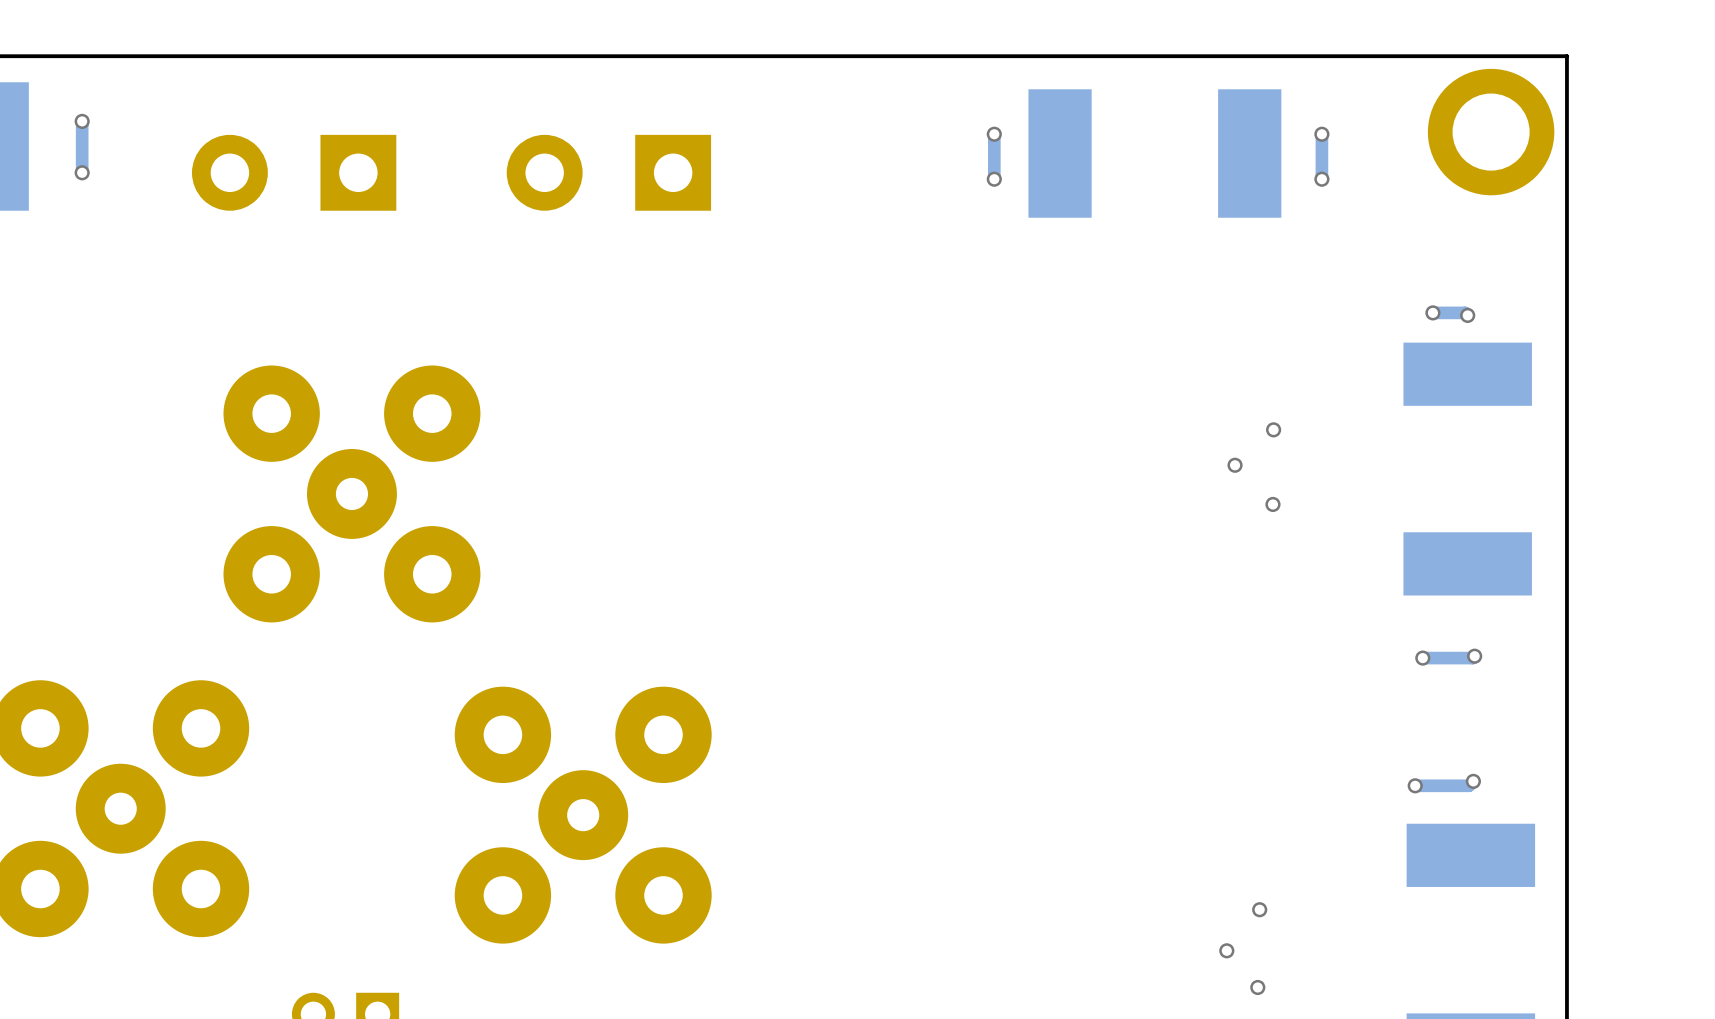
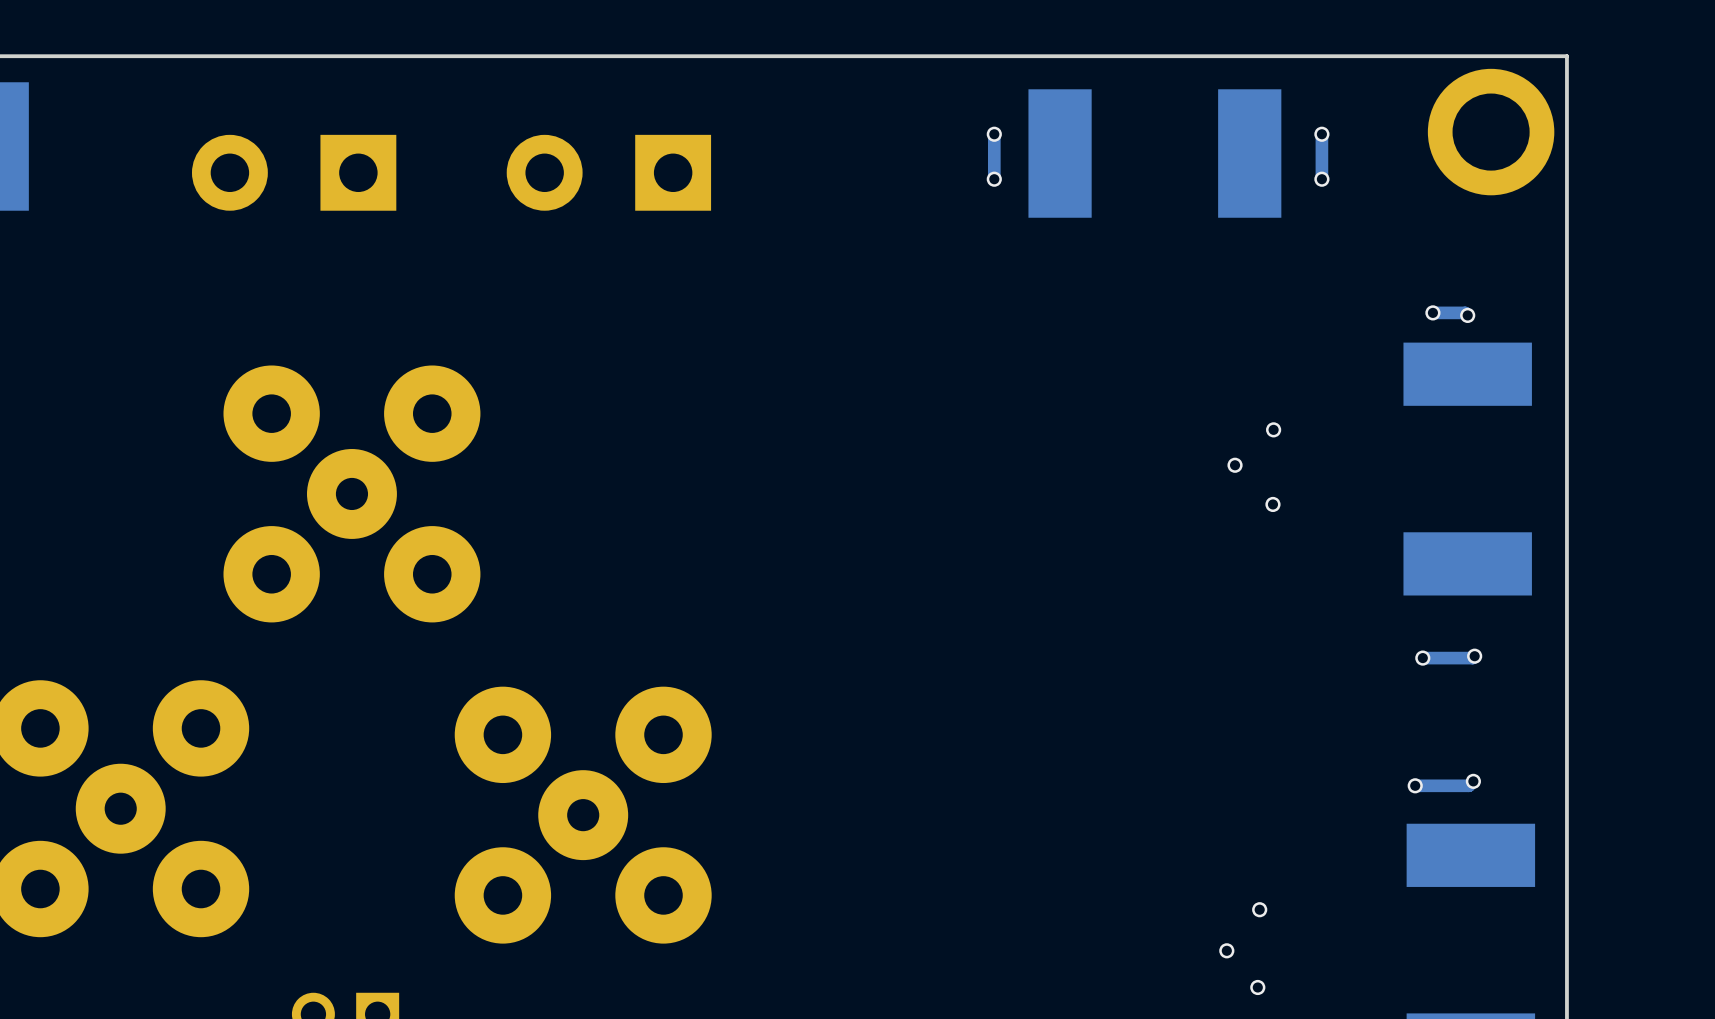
track: (82, 121) (82, 172) -> none
via: (82, 121) -> none
via: (82, 172) -> none

